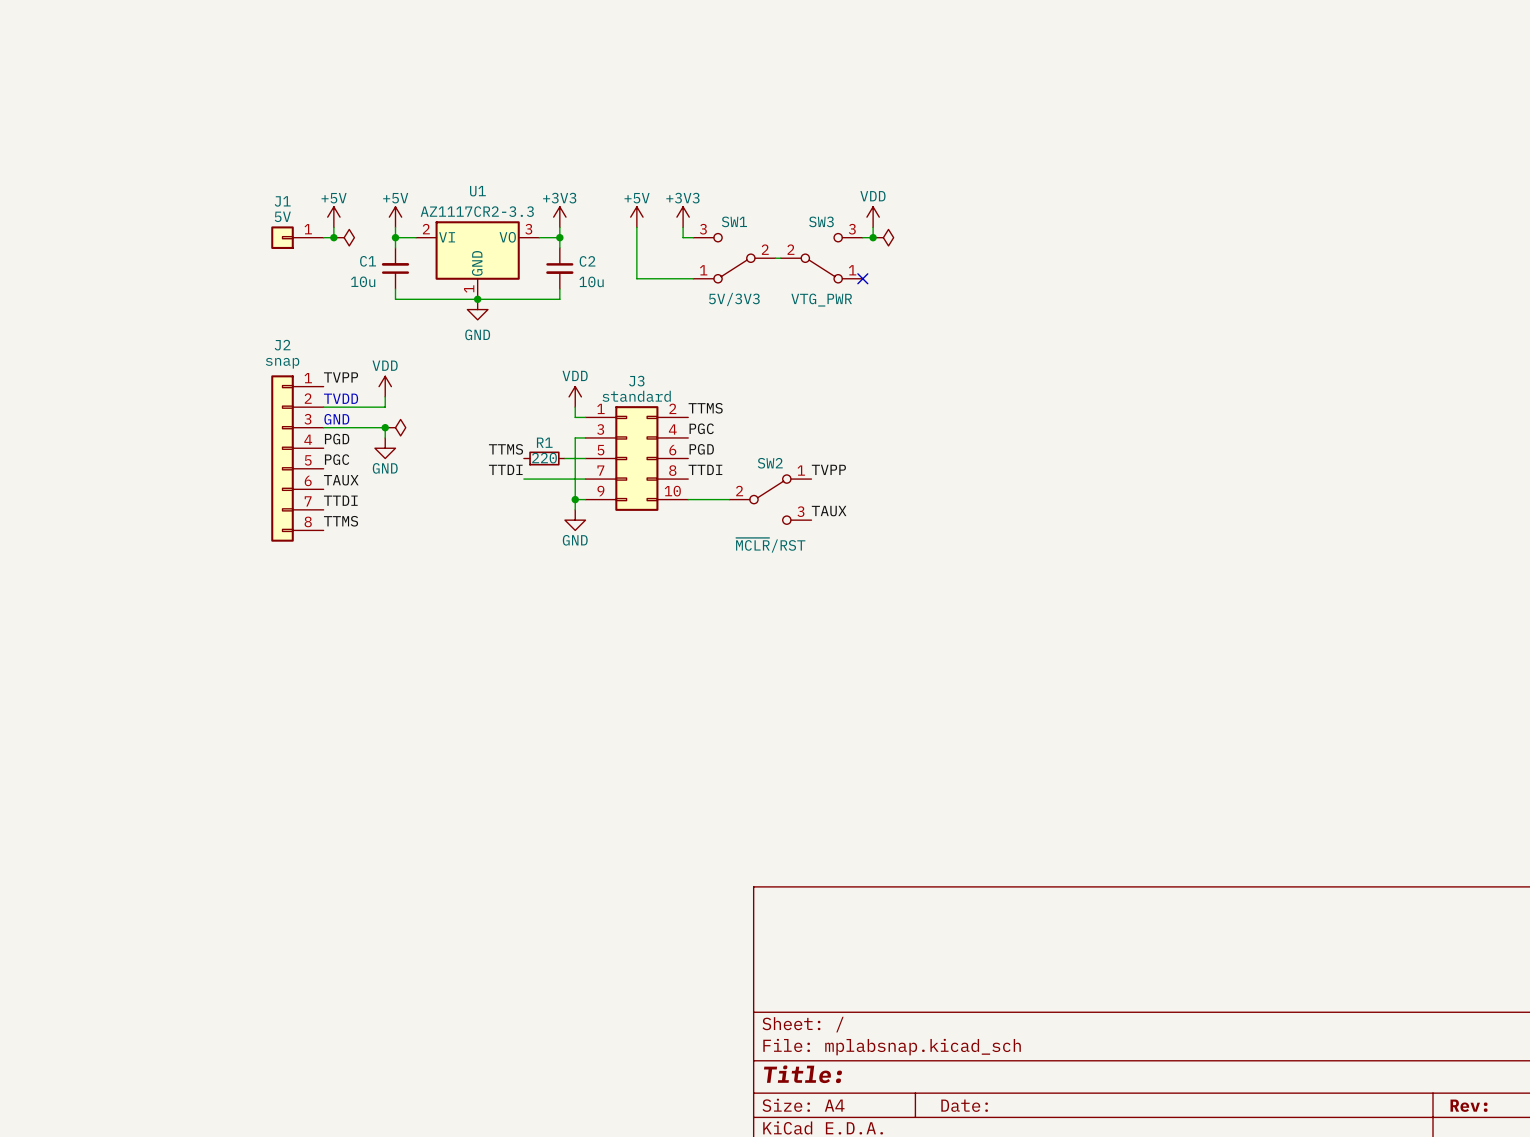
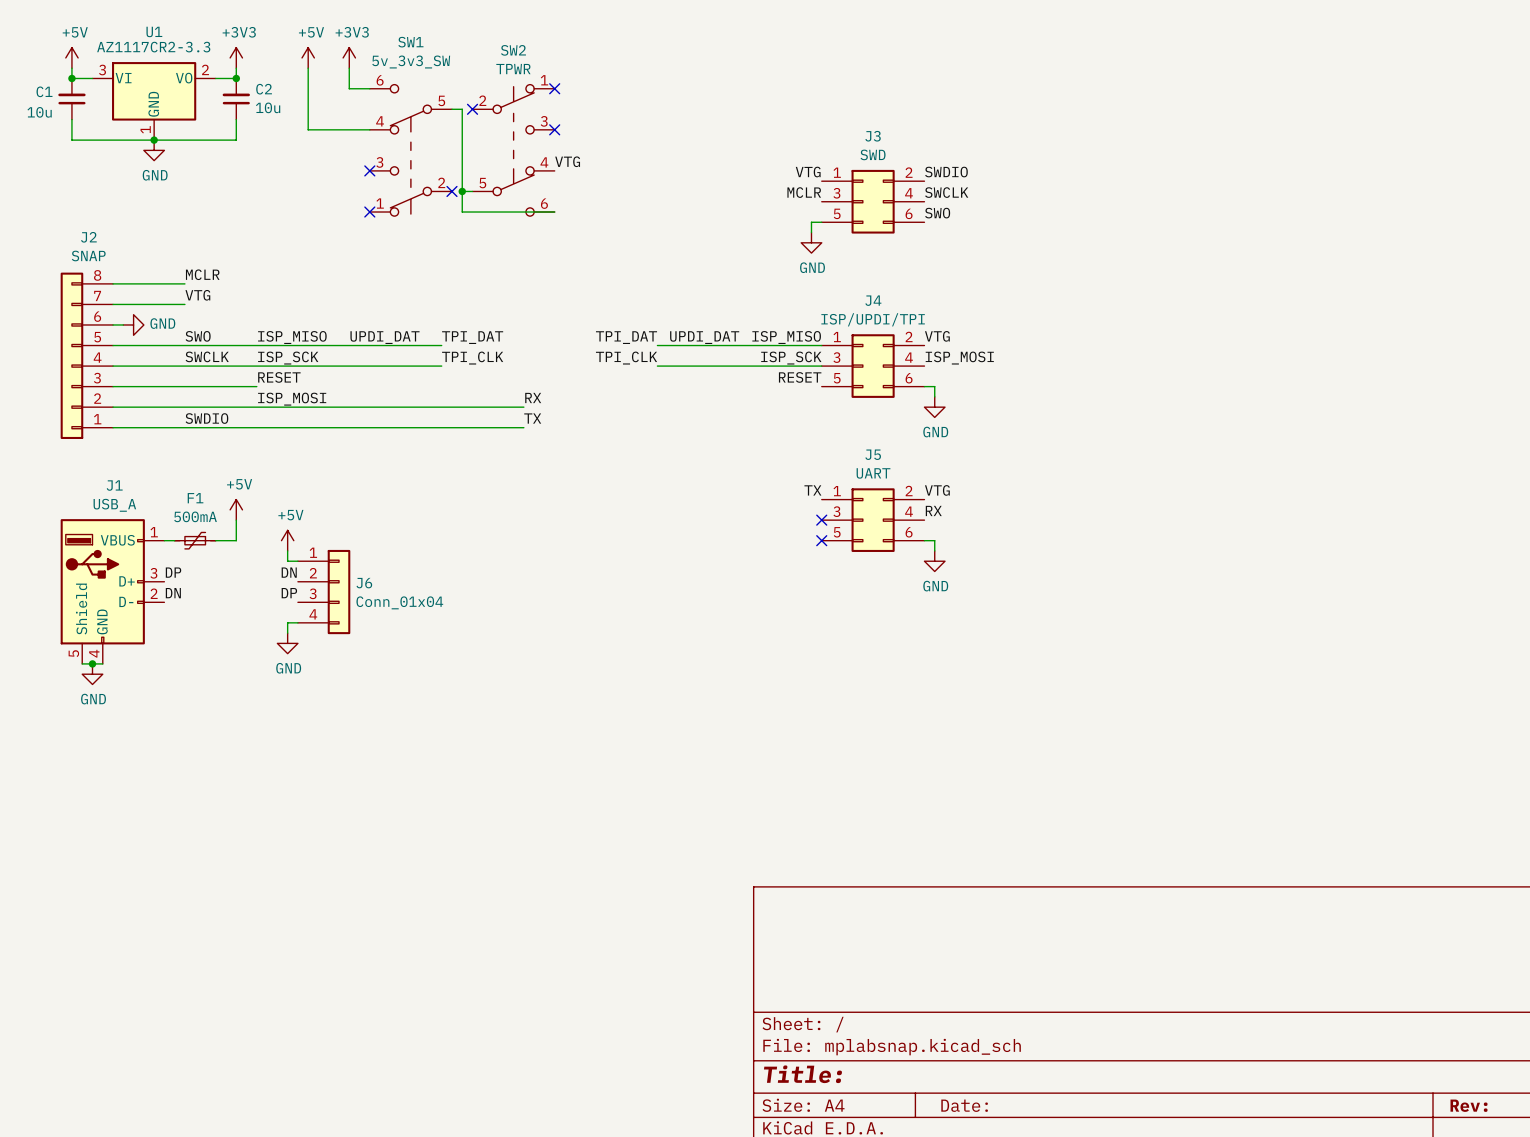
power symbol: none -> +5V (71, 57)
power symbol: none -> +3V3 (236, 57)
power symbol: none -> +5V (308, 57)
power symbol: none -> +3V3 (349, 57)
wire: none -> (71, 68) (71, 78) (92, 78)
wire: none -> (236, 68) (236, 78) (215, 78)
wire: none -> (308, 68) (308, 129) (369, 129)
wire: none -> (349, 68) (349, 88) (369, 88)
junction: none -> (71, 78)
junction: none -> (236, 78)
no-connect mark: none -> (554, 88)
wire: none -> (451, 109) (462, 109) (462, 212) (554, 212)
no-connect mark: none -> (472, 109)
wire: none -> (71, 119) (71, 140) (236, 140) (236, 119)
no-connect mark: none -> (554, 129)
junction: none -> (154, 140)
power symbol: none -> GND (154, 150)
label: none -> VTG (567, 161)
no-connect mark: none -> (369, 170)
label: none -> VTG (808, 172)
label: none -> SWDIO (946, 172)
no-connect mark: none -> (451, 191)
wire: none -> (462, 191) (472, 191)
junction: none -> (462, 191)
label: none -> MCLR (804, 192)
label: none -> SWCLK (946, 192)
J1 name position: J1 (282, 201) -> J1 (114, 485)
U1 value position: AZ1117CR2-3.3 (477, 211) -> AZ1117CR2-3.3 (153, 47)
no-connect mark: none -> (369, 212)
label: none -> SWO (937, 213)
J1 value: 5V (282, 216) -> USB_A (114, 505)
power symbol: +5V (333, 217) -> none
power symbol: +5V (395, 217) -> none
power symbol: +3V3 (559, 217) -> none
power symbol: +5V (636, 217) -> none
power symbol: +3V3 (683, 217) -> none
power symbol: VDD (873, 217) -> none
SW1 name position: SW1 (734, 221) -> SW1 (410, 42)
wire: none -> (821, 222) (811, 222) (811, 232)
J1 symbol: [271, 226, 324, 249] -> [60, 519, 165, 664]
wire: (333, 227) (333, 237) (323, 237) -> none
wire: (395, 227) (395, 247) -> none
wire: (559, 227) (559, 247) -> none
wire: (636, 227) (636, 278) (693, 278) -> none
wire: (683, 227) (683, 237) (693, 237) -> none
wire: (873, 227) (873, 237) (862, 237) -> none
U1 pin number: 2 (426, 229) -> 3 (102, 70)
U1 pin number: 3 (528, 229) -> 2 (205, 69)
SW1 symbol: [693, 233, 776, 283] -> [369, 84, 452, 217]
junction: (333, 237) -> none
power symbol: (344, 237) -> none
wire: (395, 237) (416, 237) -> none
junction: (395, 237) -> none
wire: (539, 237) (559, 237) -> none
junction: (559, 237) -> none
junction: (873, 237) -> none
power symbol: (883, 237) -> none
power symbol: none -> GND (811, 242)
wire: (775, 258) (780, 258) -> none
SW3: VTG_PWR (821, 258) -> none
U1 position: (477, 260) -> (154, 101)
C1 position: (395, 268) -> (71, 99)
C2 rotation: 0° (559, 268) -> 180° (236, 98)
C2 position: (559, 268) -> (236, 99)
label: none -> MCLR (202, 274)
no-connect mark: (862, 278) -> none
wire: none -> (113, 283) (184, 283)
wire: (395, 289) (395, 299) (559, 299) (559, 289) -> none
label: none -> VTG (197, 295)
junction: (477, 299) -> none
SW1 value: 5V/3V3 (734, 299) -> 5v_3v3_SW (411, 61)
wire: none -> (113, 304) (184, 304)
power symbol: GND (477, 309) -> none
wire: none -> (113, 324) (123, 324)
power symbol: none -> GND (133, 324)
label: none -> SWO (198, 336)
label: none -> VTG (937, 336)
label: none -> ISP_MISO (292, 337)
label: none -> UPDI_DAT (385, 337)
label: none -> TPI_DAT (472, 337)
label: none -> TPI_DAT (626, 337)
label: none -> UPDI_DAT (704, 337)
label: none -> ISP_MISO (786, 337)
wire: none -> (113, 345) (441, 345)
J2 name position: J2 (282, 345) -> J2 (88, 237)
wire: none -> (657, 345) (821, 345)
label: none -> SWCLK (207, 356)
label: none -> ISP_SCK (288, 358)
label: none -> TPI_CLK (472, 358)
label: none -> TPI_CLK (626, 358)
label: none -> ISP_SCK (791, 358)
label: none -> ISP_MOSI (959, 358)
J2 value: snap (282, 363) -> SNAP (88, 255)
wire: none -> (113, 366) (441, 366)
wire: none -> (657, 366) (821, 366)
J4: none -> ISP/UPDI/TPI (873, 366)
label: none -> RESET (279, 377)
label: TVPP (341, 377) -> none
label: none -> RESET (800, 377)
wire: none -> (113, 386) (256, 386)
power symbol: VDD (385, 386) -> none
wire: none -> (924, 386) (934, 386) (934, 396)
wire: (385, 396) (385, 407) -> (523, 407) (385, 407)
power symbol: VDD (575, 396) -> none
J3 value: standard (636, 396) -> SWD (873, 154)
label: none -> RX (533, 397)
text: TVDD (341, 398) -> none
label: none -> ISP_MOSI (292, 399)
J3 symbol: [585, 406, 689, 511] -> [821, 169, 925, 234]
wire: none -> (113, 407) (323, 407)
wire: (575, 407) (575, 417) (585, 417) -> none
power symbol: none -> GND (934, 407)
label: TTMS (705, 408) -> none
label: none -> SWDIO (206, 418)
label: none -> TX (532, 418)
text: GND (336, 419) -> none
wire: none -> (113, 427) (323, 427)
wire: (385, 427) (385, 437) -> (385, 427) (523, 427)
junction: (385, 427) -> none
power symbol: (395, 427) -> none
label: PGC (701, 428) -> none
wire: (585, 437) (575, 437) (575, 509) -> none
label: PGD (337, 439) -> none
power symbol: GND (385, 448) -> none
label: TTMS (505, 449) -> none
label: PGD (701, 449) -> none
J2 flip: as is (282, 458) -> up-down (71, 355)
J2 position: (297, 458) -> (86, 355)
R1: 220 (544, 458) -> none
wire: (564, 458) (585, 458) -> none
label: PGC (337, 459) -> none
SW2 name position: SW2 (770, 463) -> SW2 (513, 50)
label: TTDI (505, 469) -> none
label: TTDI (705, 469) -> none
label: TVPP (828, 469) -> none
SW2 symbol: [729, 474, 812, 525] -> [472, 84, 555, 217]
wire: (523, 479) (585, 479) -> none
label: TAUX (341, 480) -> none
label: none -> VTG (937, 490)
wire: (575, 499) (585, 499) -> none
junction: (575, 499) -> none
wire: (688, 499) (729, 499) -> none
label: TTDI (340, 500) -> none
power symbol: none -> +5V (236, 509)
label: none -> RX (933, 510)
label: TAUX (829, 511) -> TX (812, 490)
wire: none -> (236, 520) (236, 540) (215, 540)
power symbol: GND (575, 520) -> none
no-connect mark: none -> (821, 520)
J5: none -> UART (873, 520)
label: TTMS (341, 521) -> none
wire: none -> (164, 540) (174, 540)
F1: none -> 500mA (195, 540)
power symbol: none -> +5V (287, 540)
no-connect mark: none -> (821, 540)
wire: none -> (924, 540) (934, 540) (934, 550)
SW2 value: ~{MCLR}/RST (770, 545) -> TPWR (513, 69)
wire: none -> (287, 550) (287, 561) (297, 561)
power symbol: none -> GND (934, 561)
label: none -> DP (173, 572)
label: none -> DN (289, 572)
J6: none -> Conn_01x04 (324, 592)
label: none -> DN (173, 593)
label: none -> DP (289, 593)
wire: none -> (297, 622) (287, 622) (287, 633)
power symbol: none -> GND (287, 643)
wire: none -> (82, 663) (102, 663)
junction: none -> (92, 663)
power symbol: none -> GND (92, 674)

